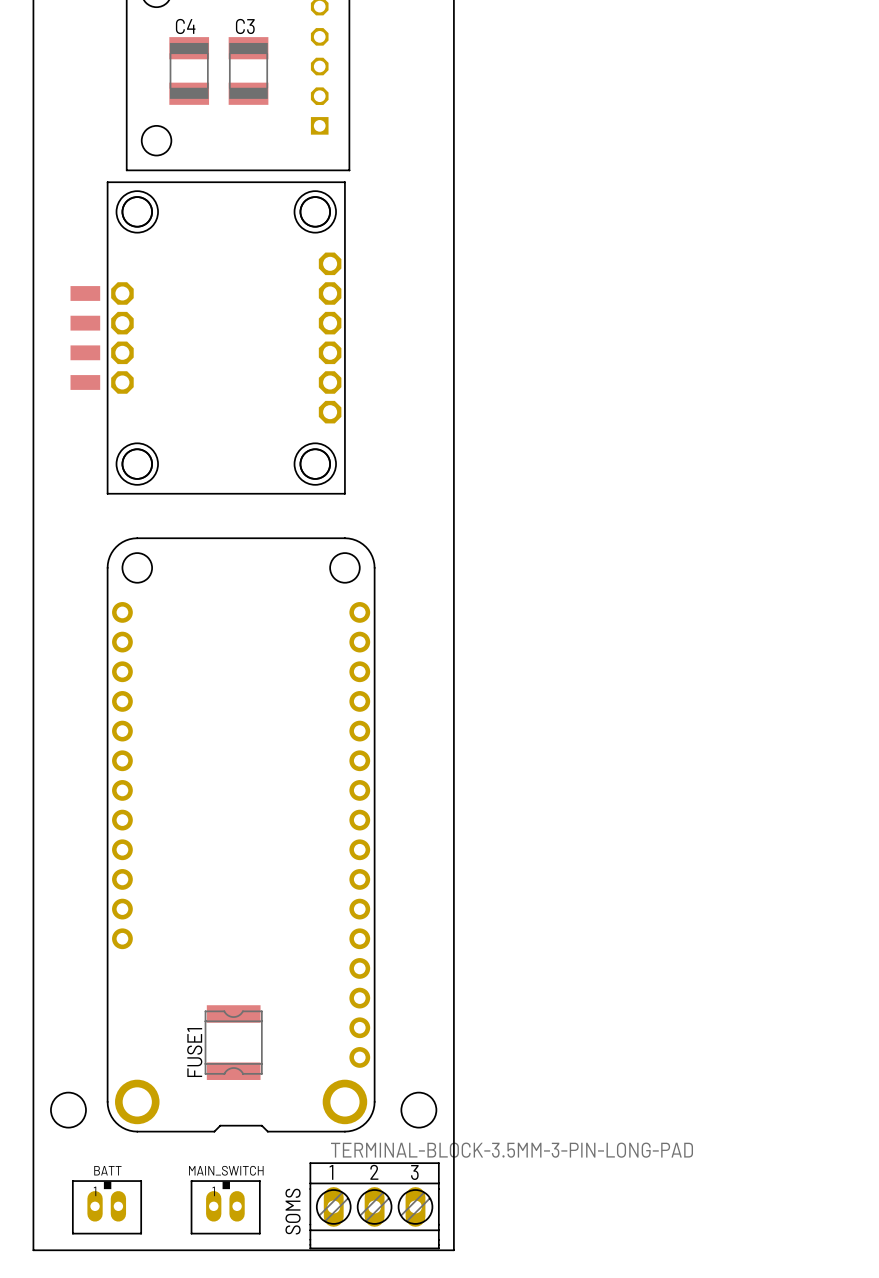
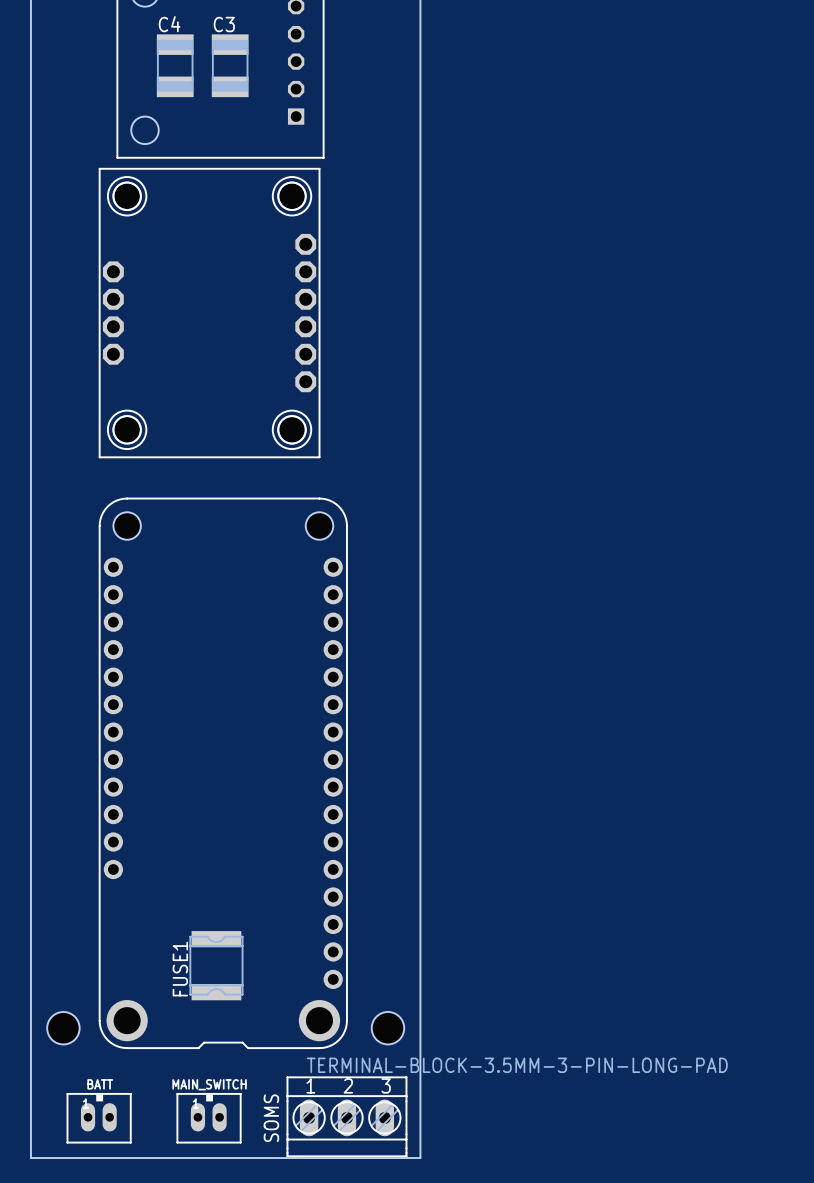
part: (85, 293) -> none
part: (85, 323) -> none
part: (85, 352) -> none
part: (85, 382) -> none

